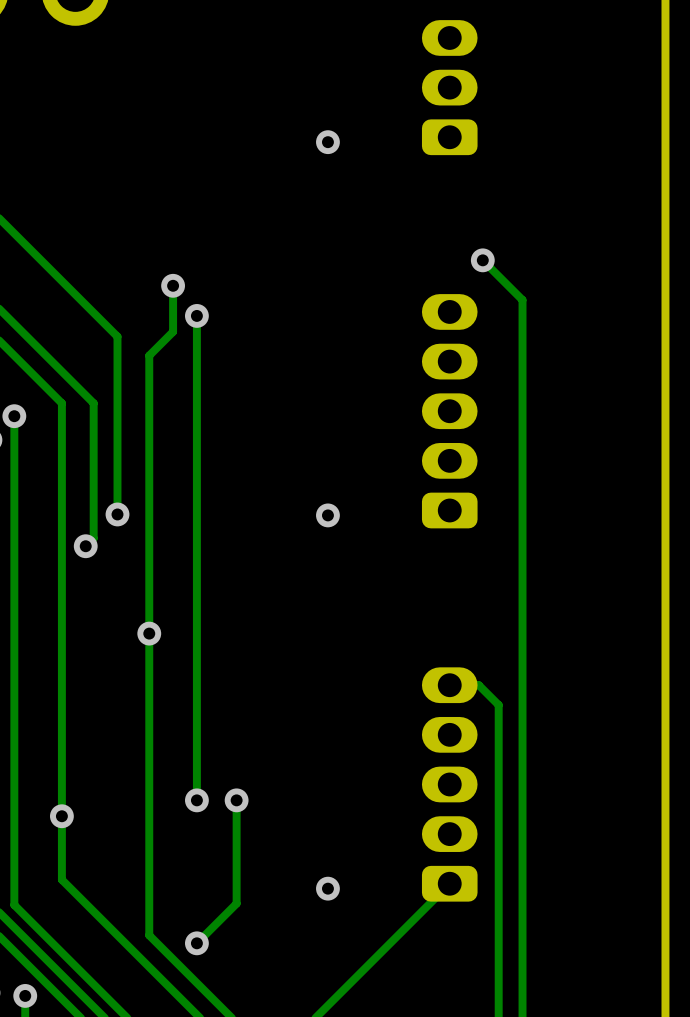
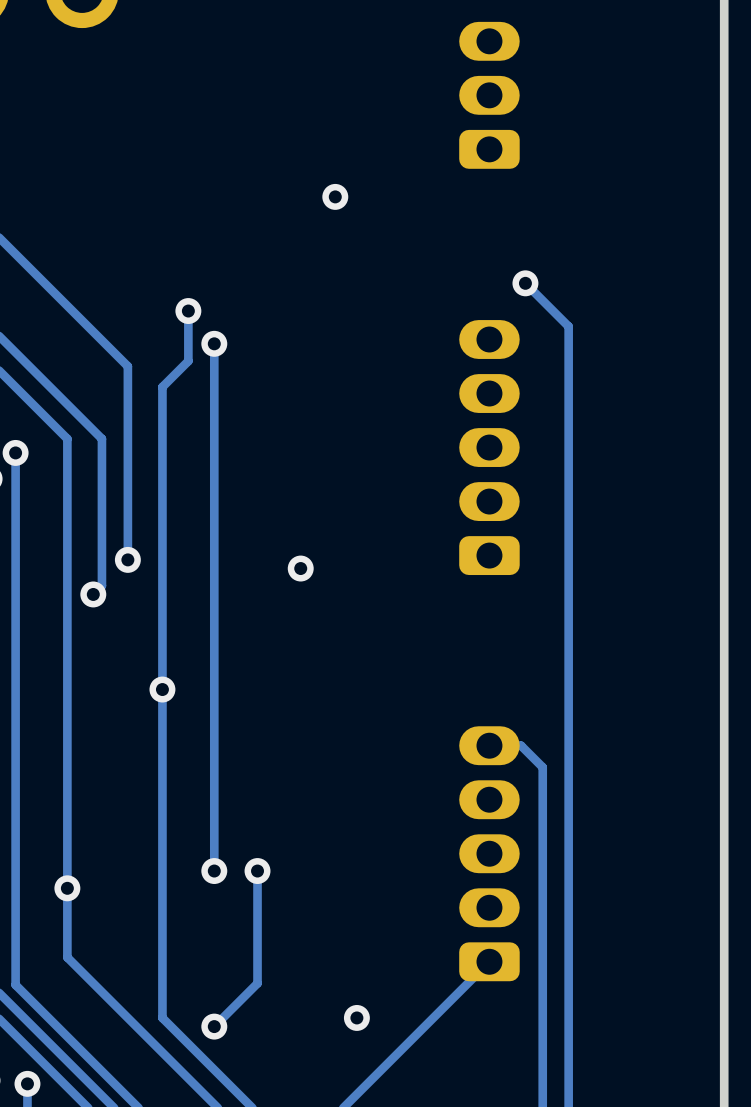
via position: (327, 142) -> (335, 196)
via position: (327, 515) -> (300, 568)
via position: (327, 888) -> (356, 1017)

